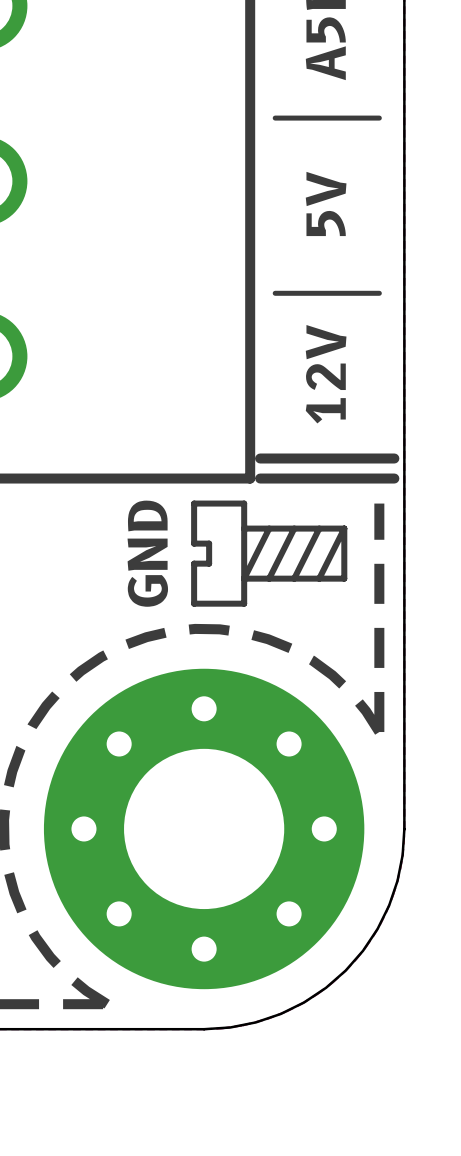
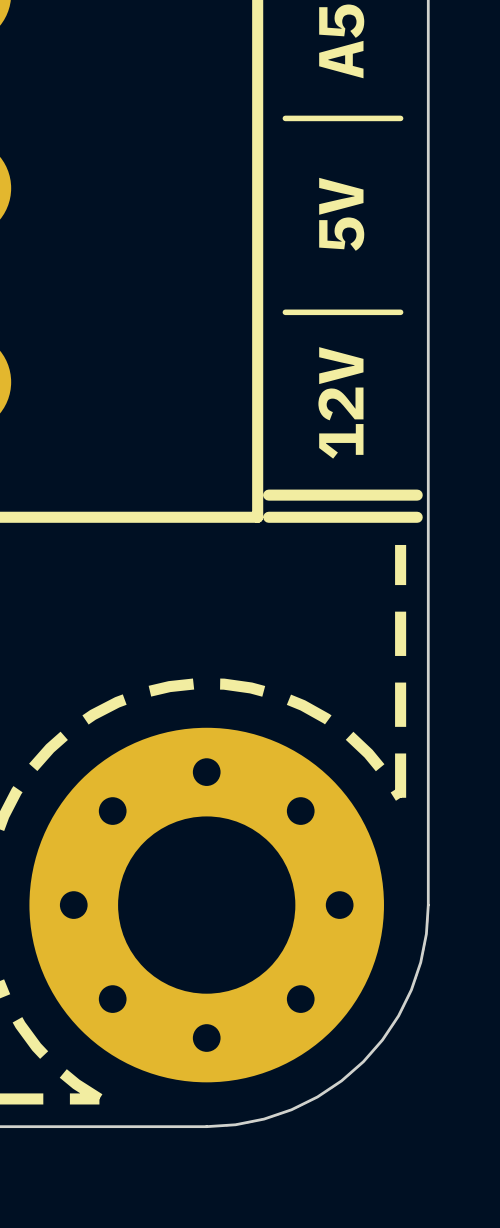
drawing: [191, 500, 348, 607] -> none
text: GND (147, 553) -> none

